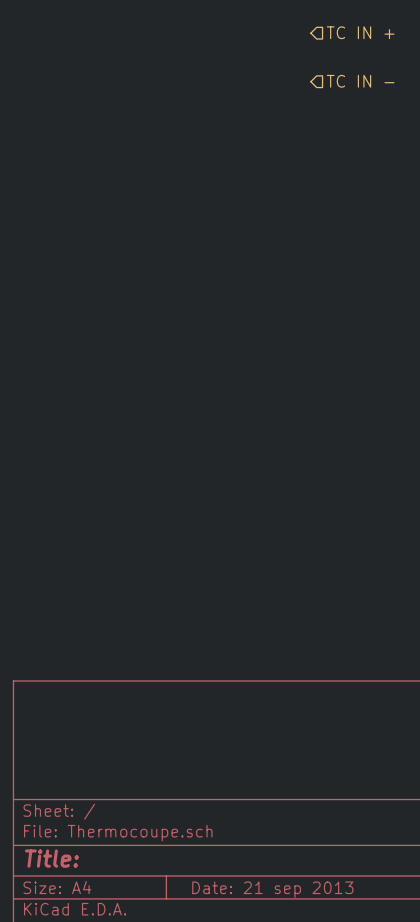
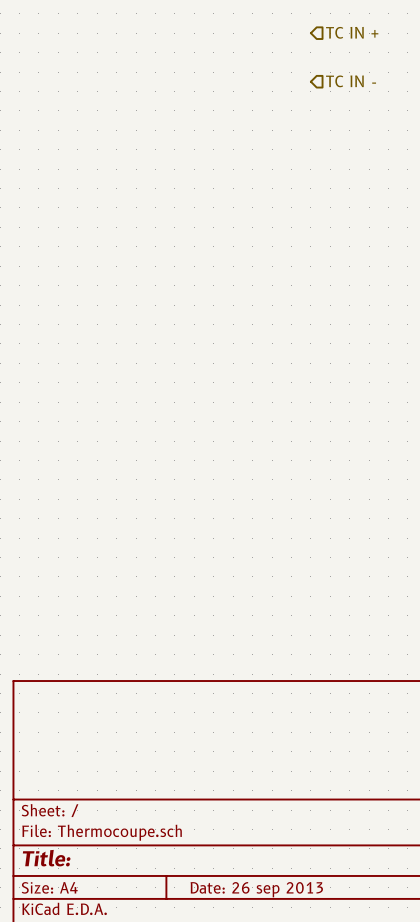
title block: Date: 21 sep 2013 (272, 889) -> Date: 26 sep 2013 (256, 889)

